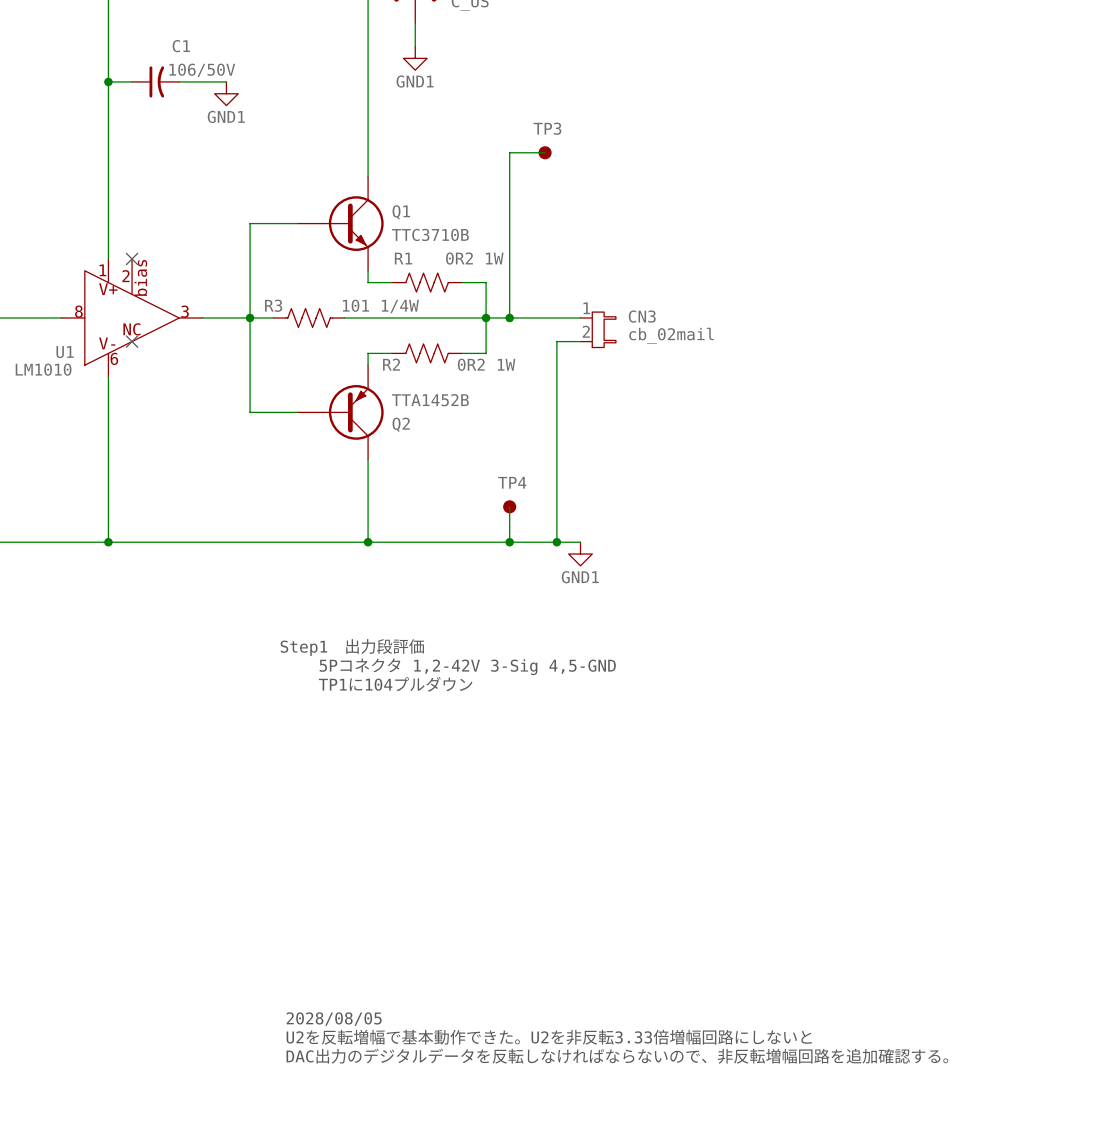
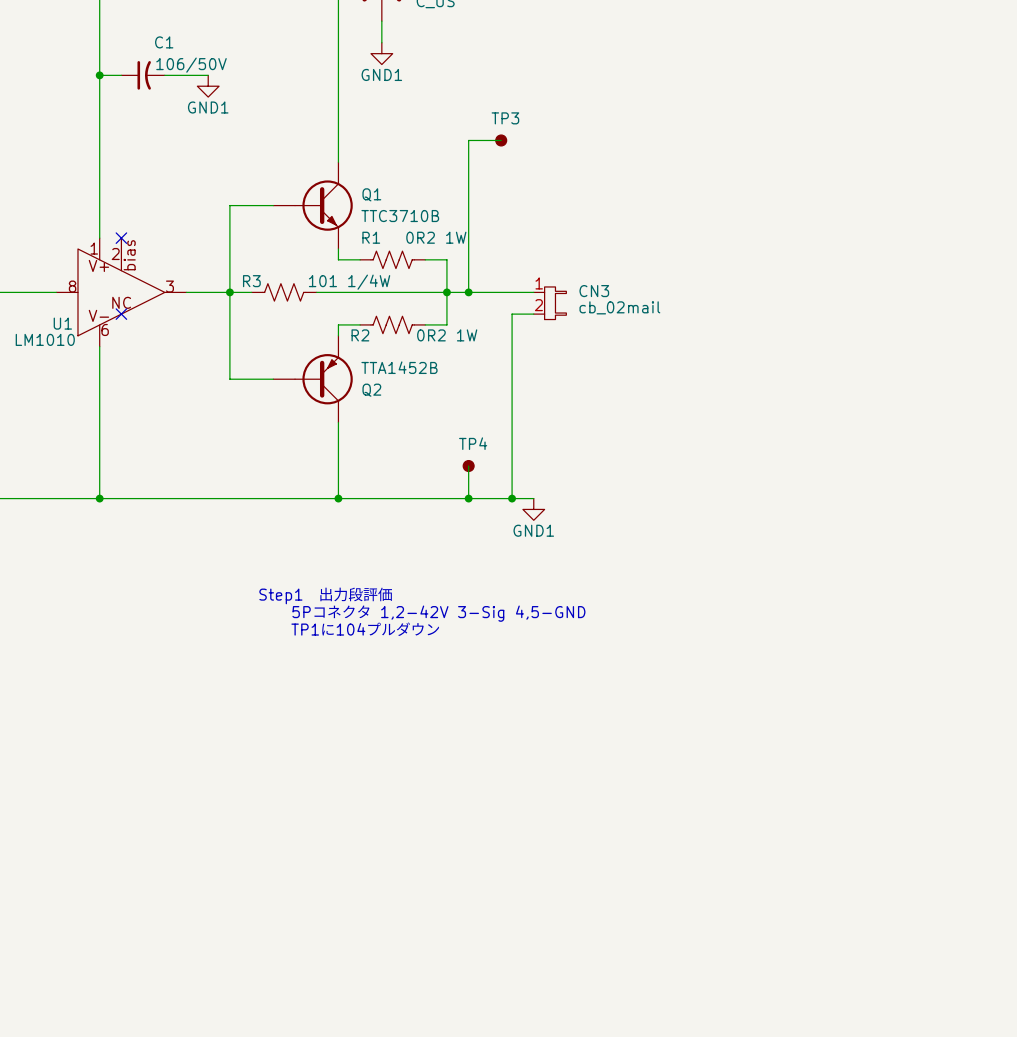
text: 2028/08/05 (334, 1019) -> none
text: U2を反転増幅で基本動作できた。U2を非反転3.33倍増幅回路にしないと (549, 1037) -> none
text: DAC出力のデジタルデータを反転しなければならないので、非反転増幅回路を追加確認する。 (617, 1056) -> none

